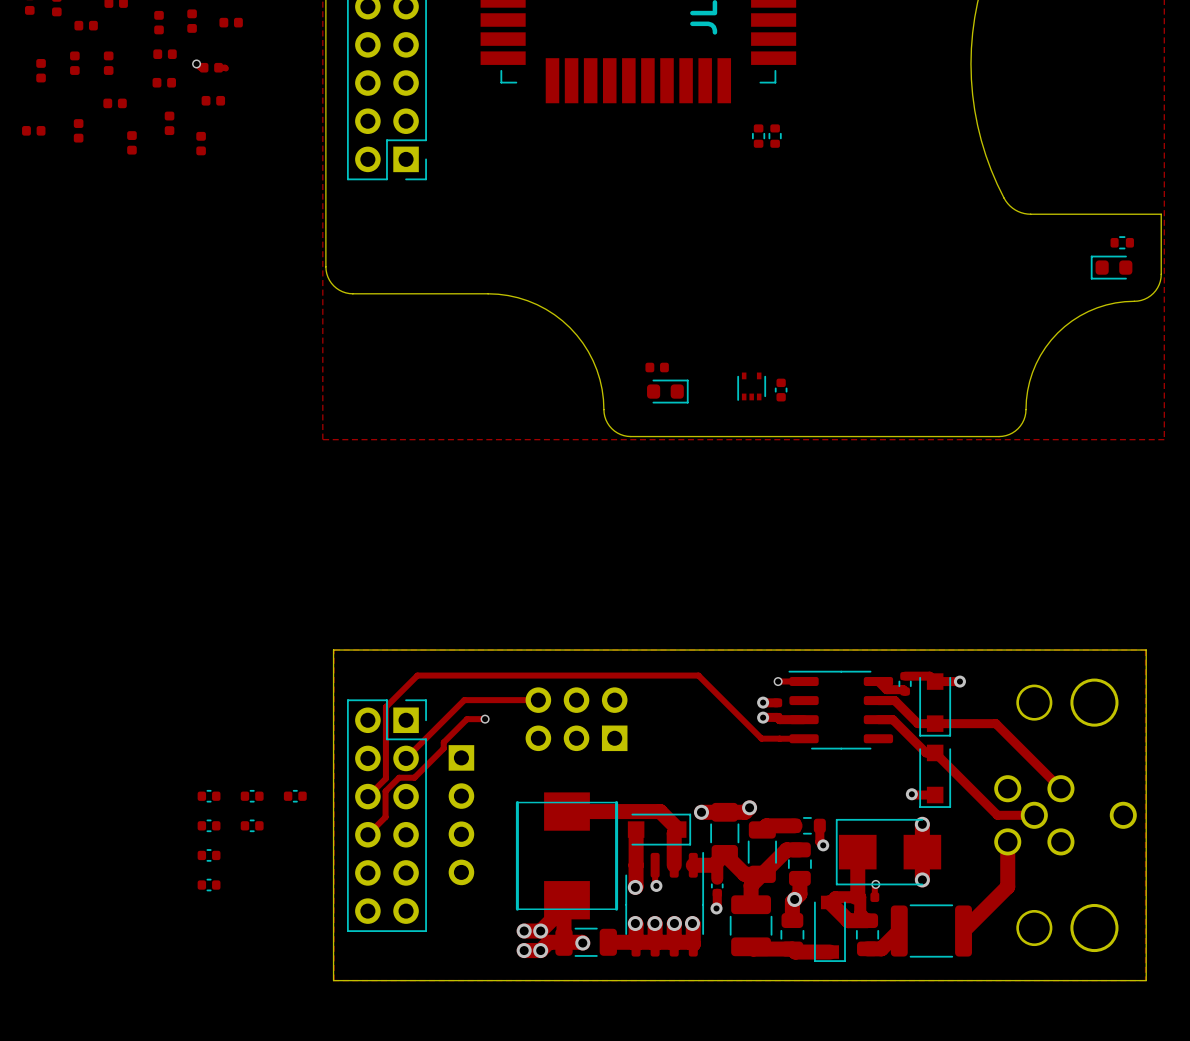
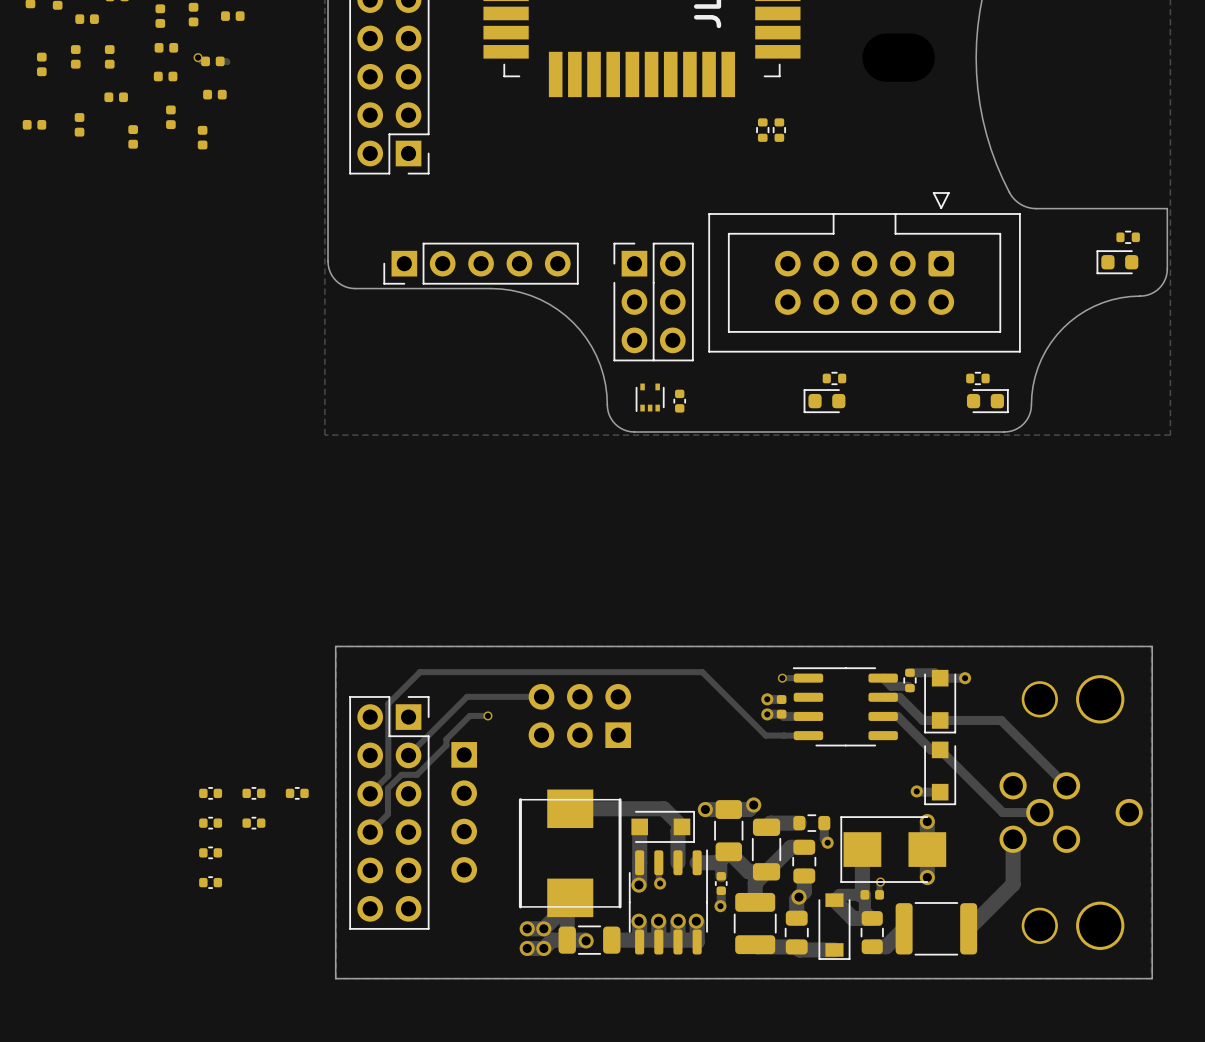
part: none -> (481, 263)
part: none -> (864, 272)
part: none -> (653, 302)
part: (657, 367) -> none
part: none -> (834, 378)
part: none -> (977, 378)
part position: (751, 386) -> (650, 397)
part position: (781, 390) -> (679, 401)
part rotation: 0° (667, 391) -> 180° (824, 401)
part position: (667, 391) -> (824, 401)
part: none -> (987, 401)

